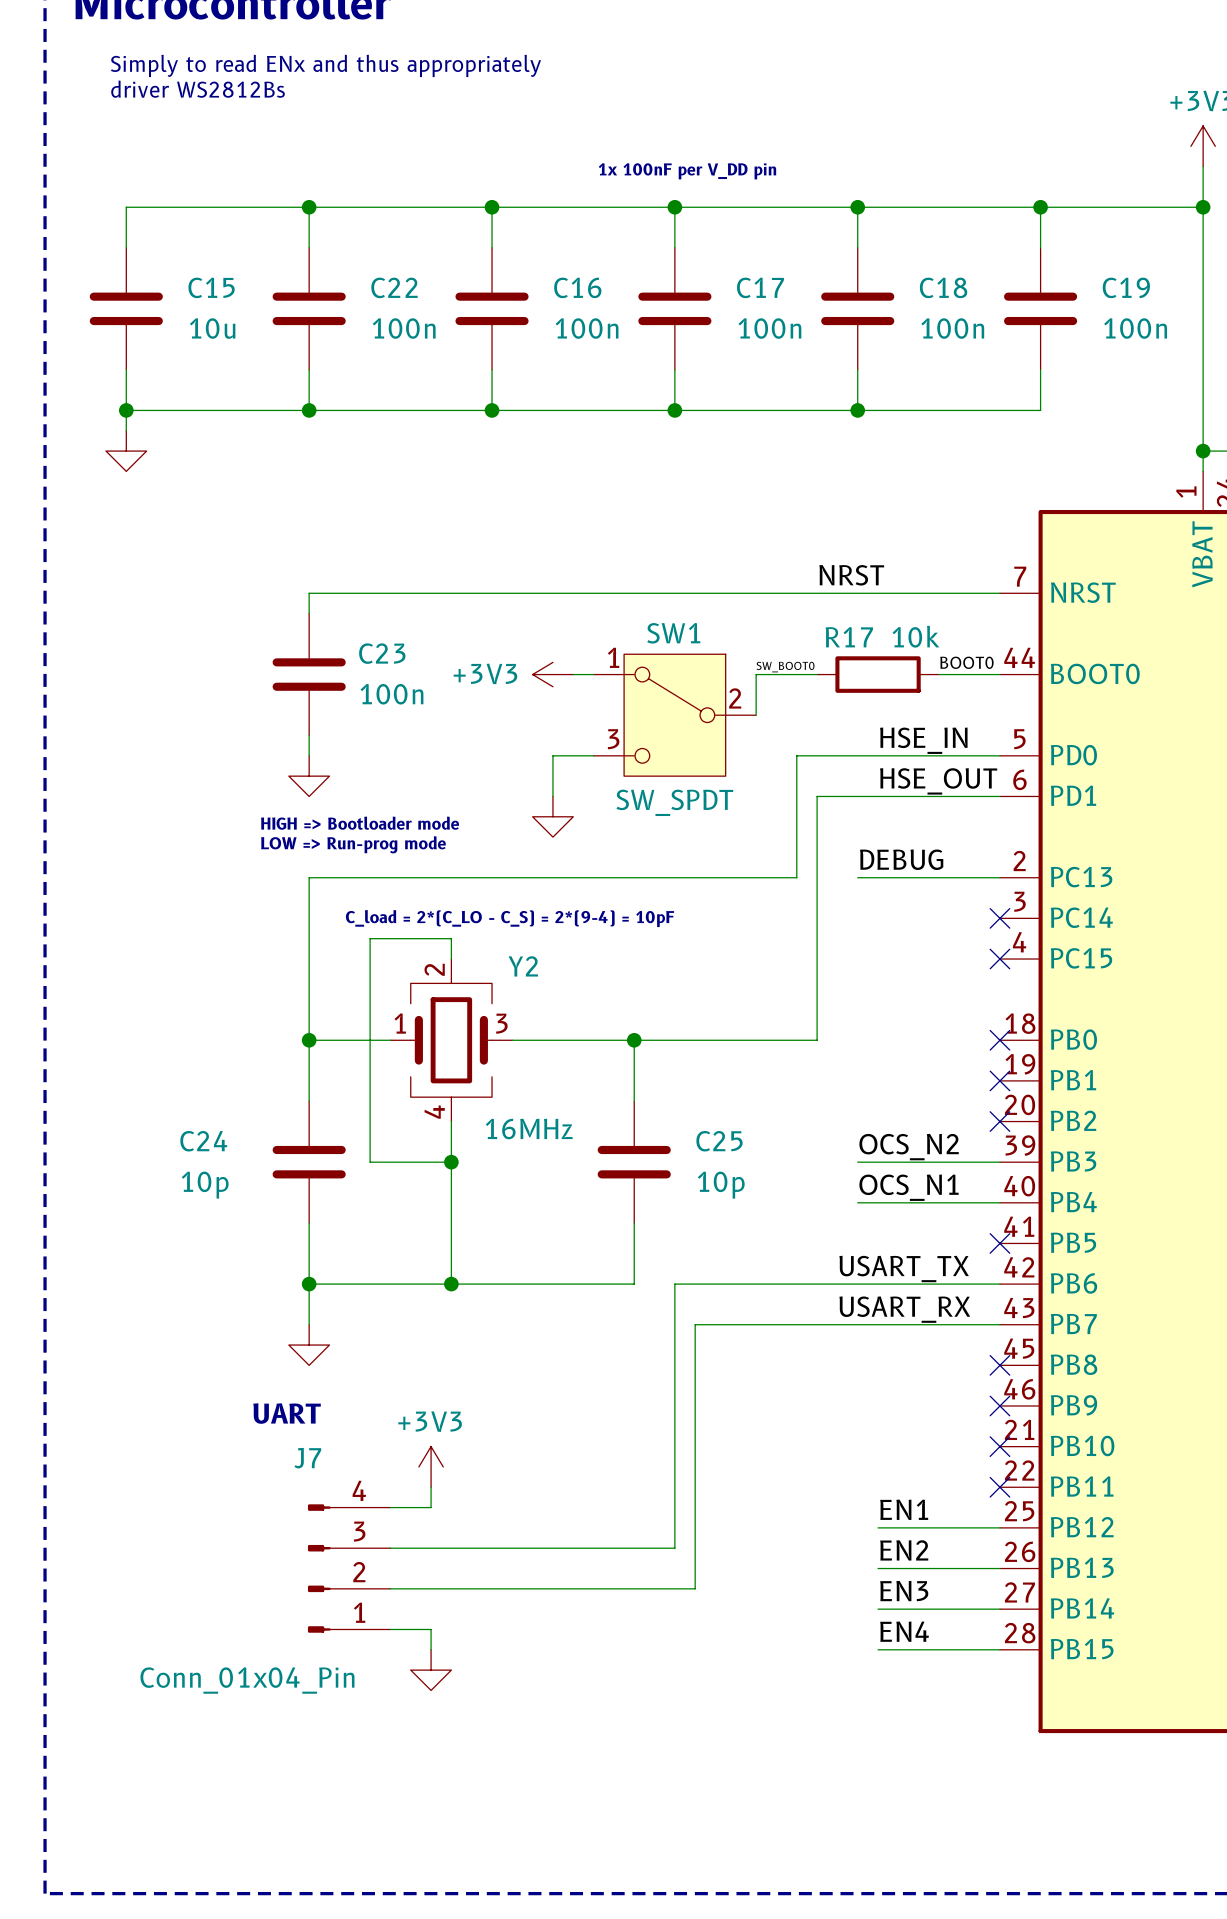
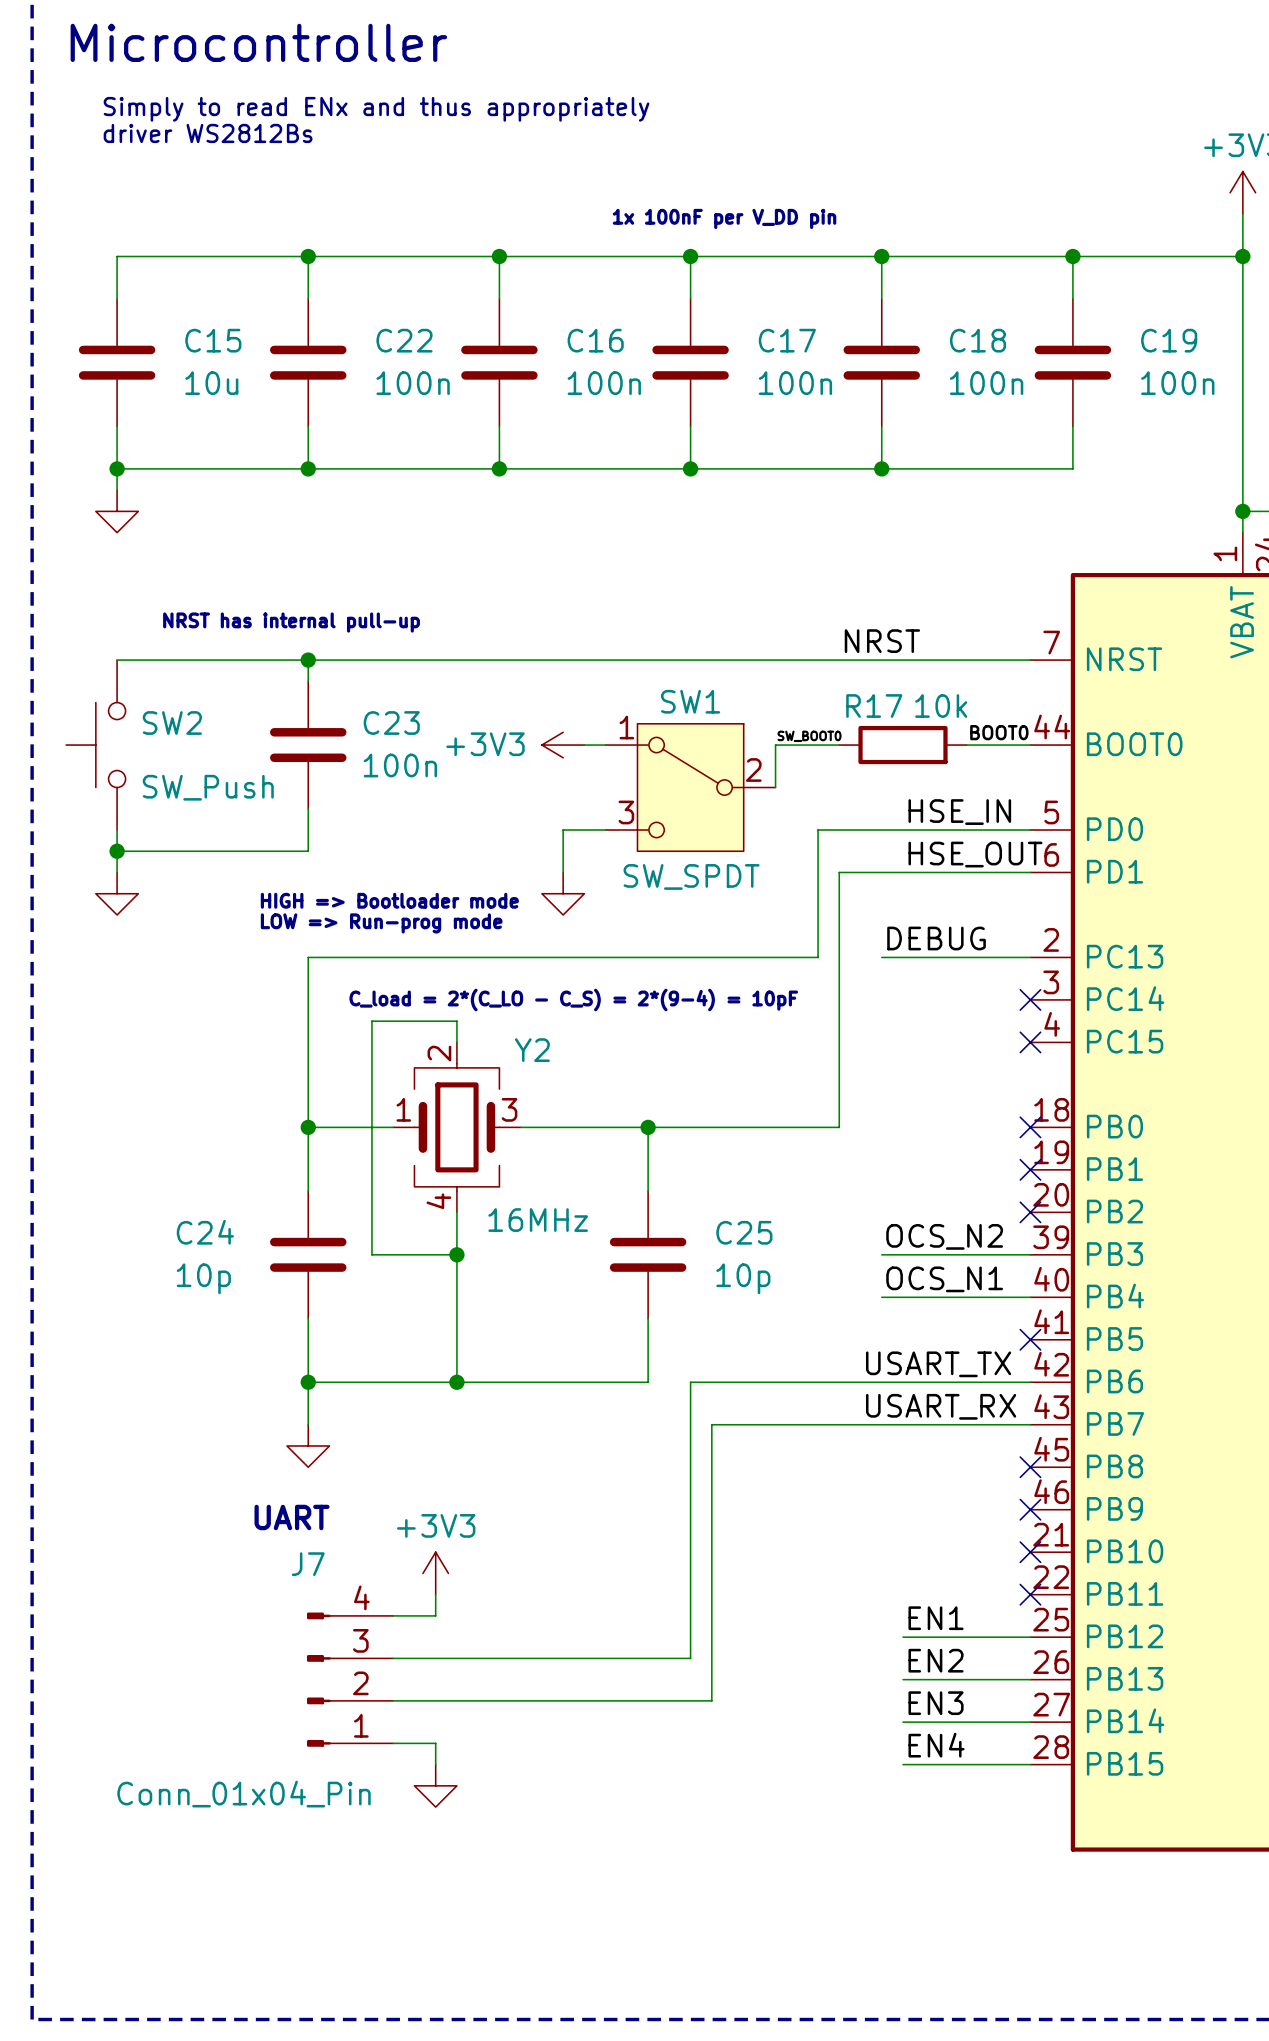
text: none -> NRST has internal pull-up (291, 622)
wire: none -> (117, 660) (308, 660)
junction: none -> (308, 660)
SW2: none -> SW_Push (95, 745)
wire: none -> (117, 830) (117, 872)
wire: none -> (308, 830) (308, 851) (117, 851)
junction: none -> (117, 851)
power symbol position: (309, 776) -> (117, 893)

